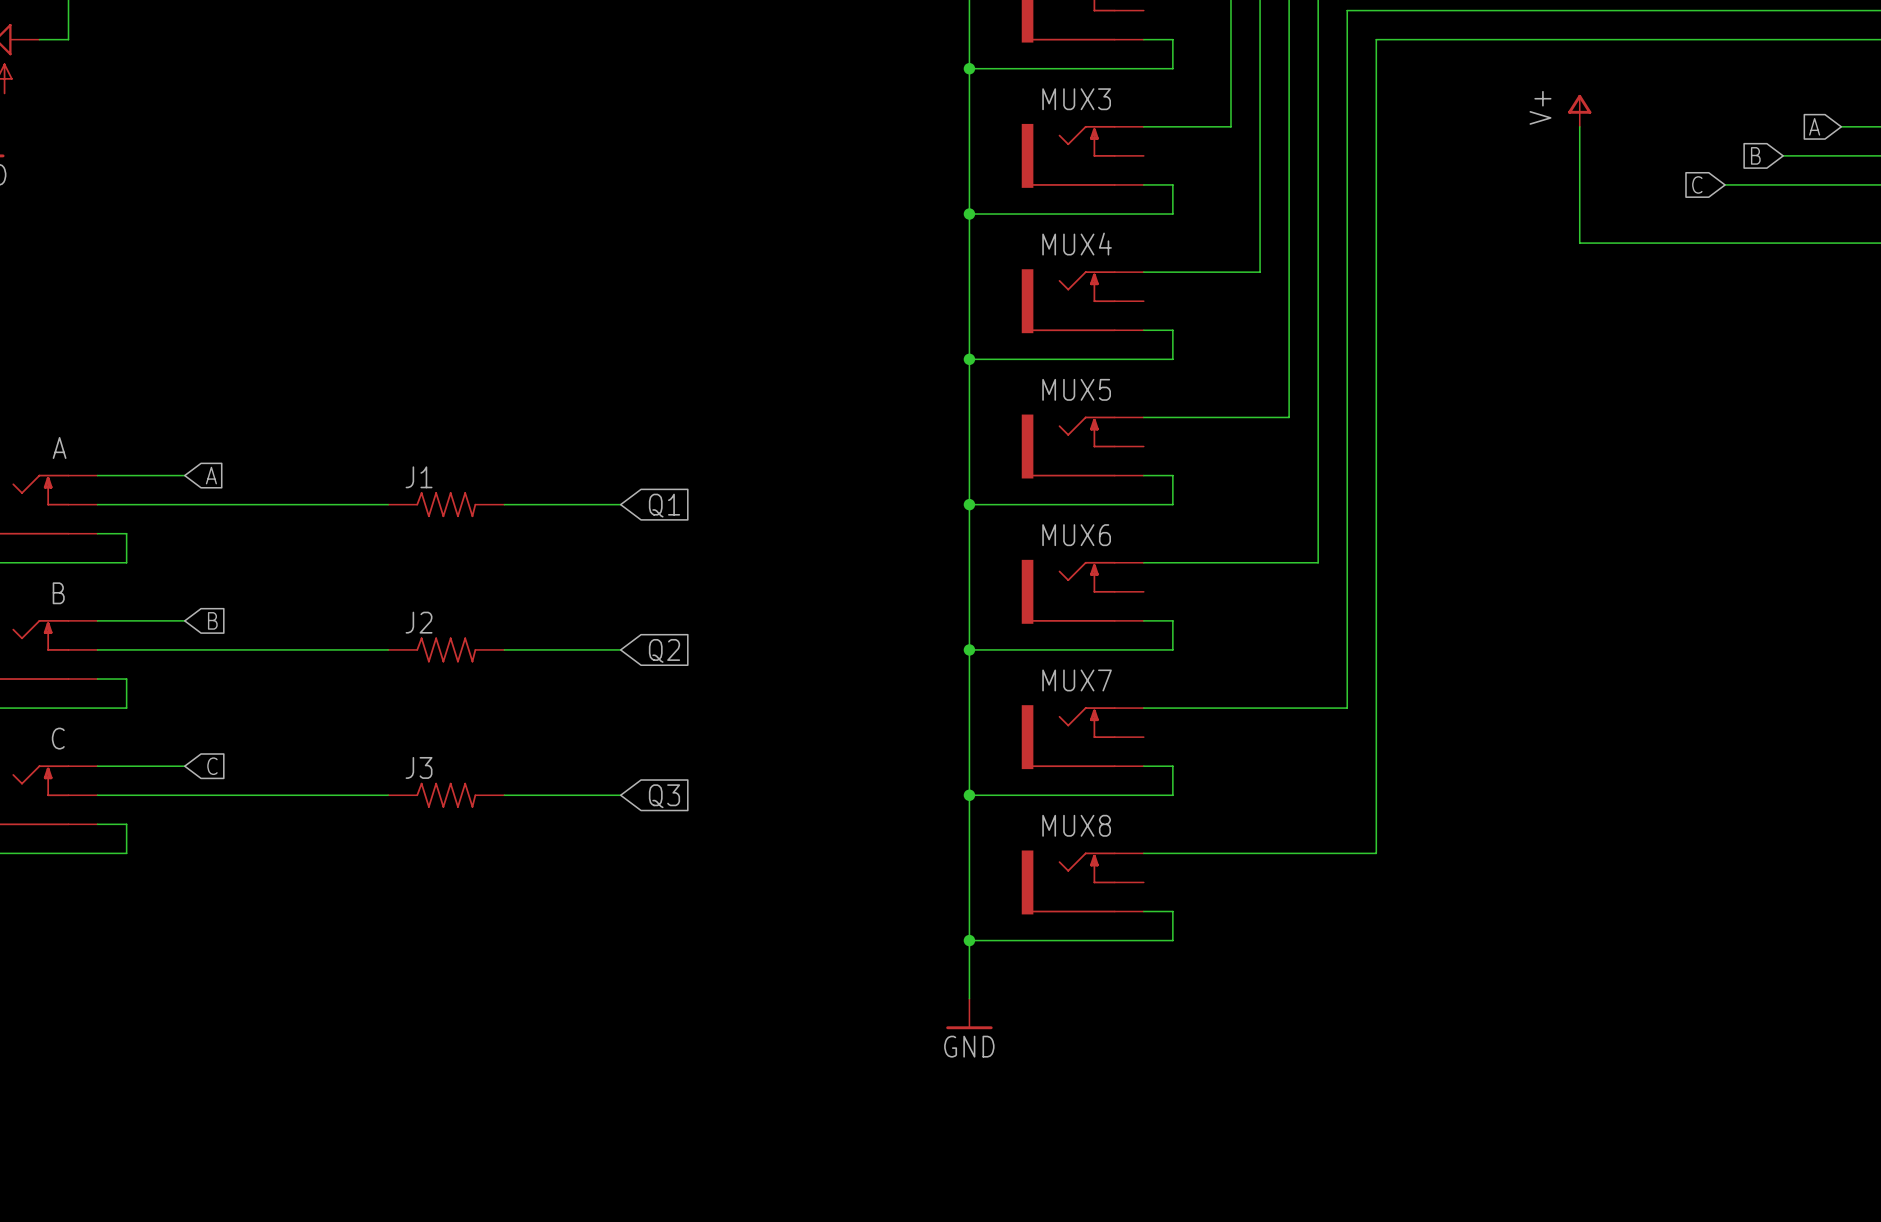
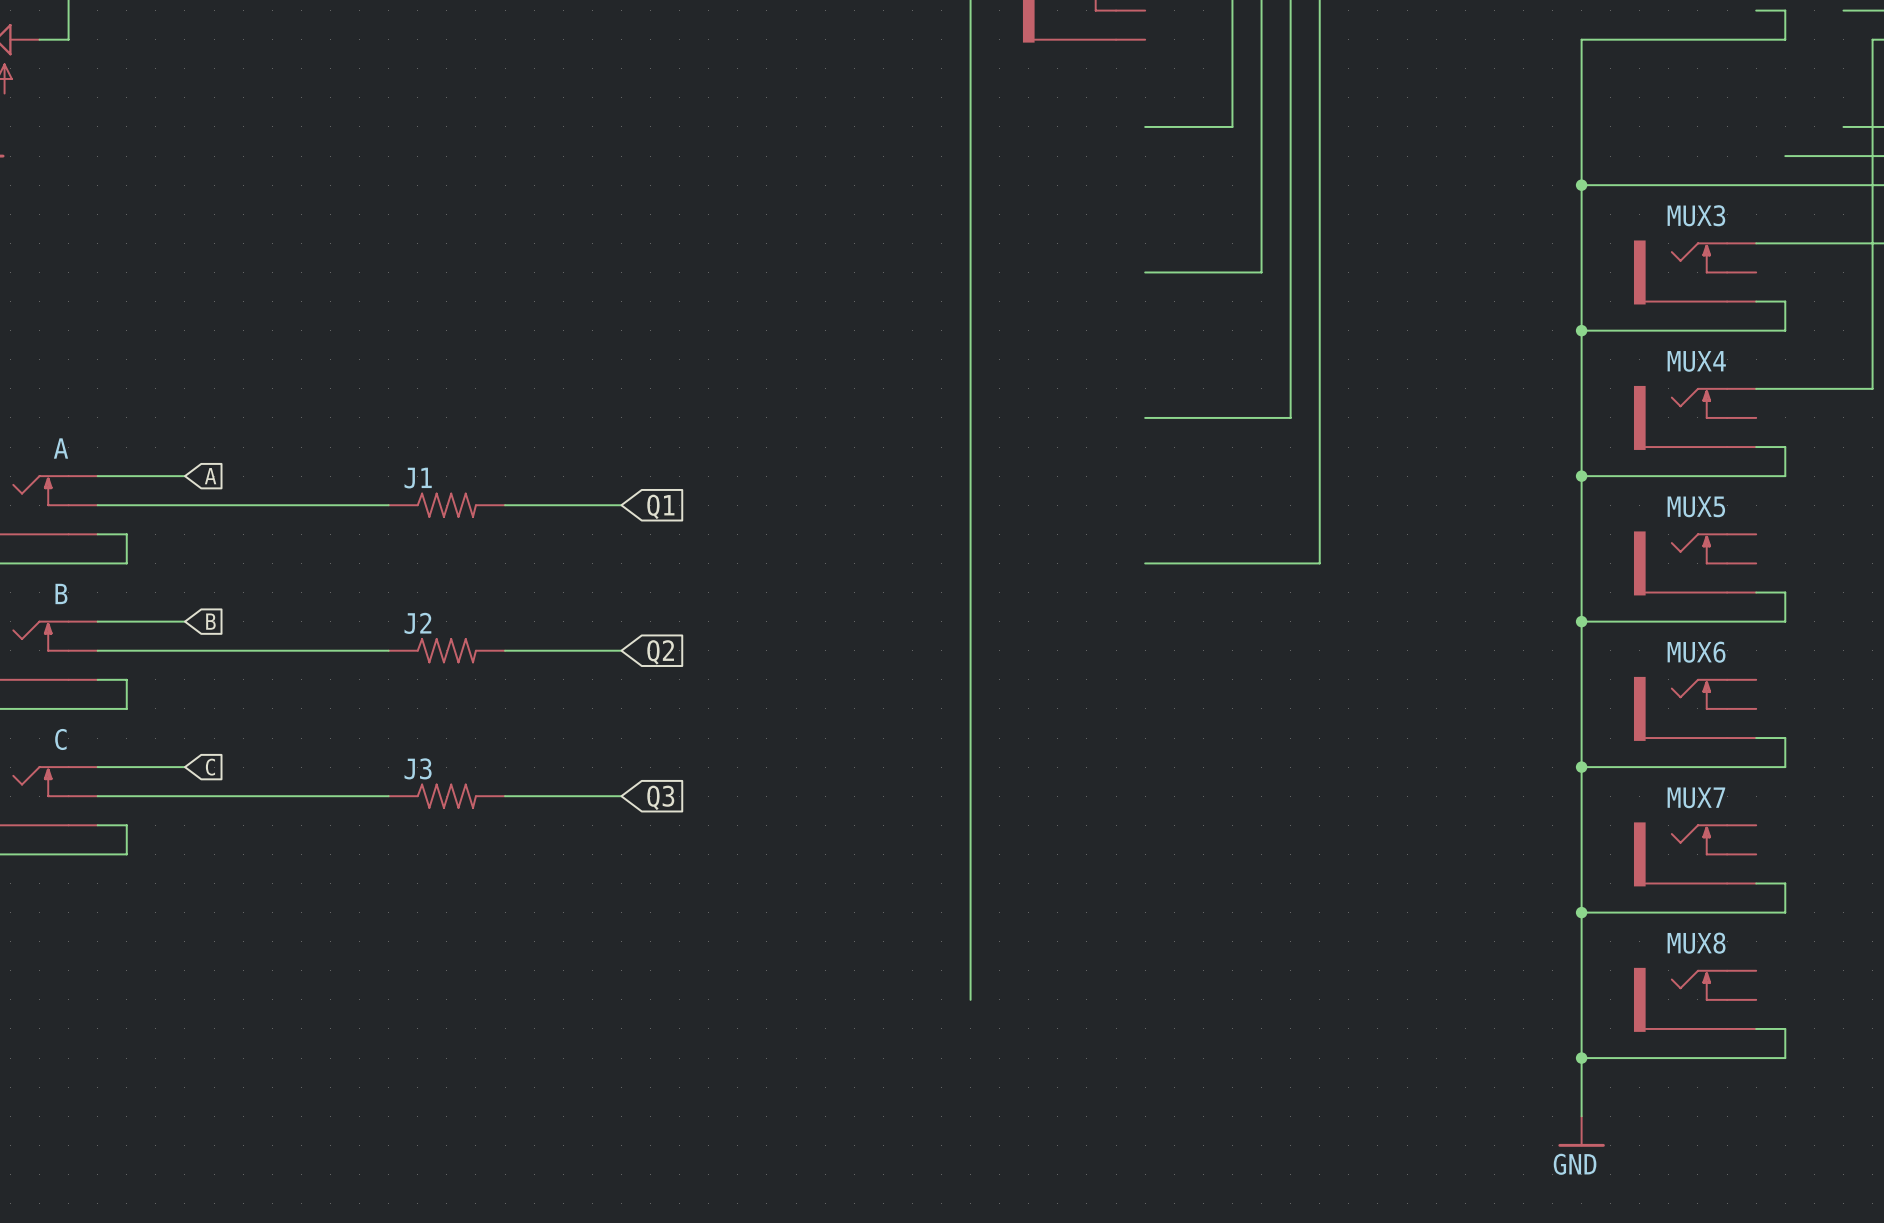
wire: (1754, 10) (1347, 10) (1347, 708) (1143, 708) -> none
wire: (1783, 10) (1841, 10) -> (1785, 10) (1785, 39)
wire: (1143, 39) (1172, 39) (1172, 68) (969, 68) -> none
wire: (1579, 39) (1376, 39) (1376, 853) (1143, 853) -> (1581, 39) (1581, 126)
wire: (1783, 39) (1870, 39) -> (1756, 388) (1872, 388) (1872, 39)
junction: (969, 68) -> none
power symbol: V+ (1579, 110) -> none
global label: A (1814, 126) -> none
MUX3 position: (1082, 155) -> (1695, 272)
global label: B (1755, 155) -> none
wire: (1143, 184) (1172, 184) (1172, 214) (969, 214) -> none
wire: none -> (1581, 185) (1727, 185)
junction: none -> (1581, 185)
global label: C (1697, 184) -> none
junction: (969, 214) -> none
wire: (1579, 243) (1754, 243) -> (1581, 243) (1581, 1116)
MUX4 position: (1082, 301) -> (1695, 417)
wire: none -> (1756, 301) (1785, 301) (1785, 330) (1581, 330)
wire: (1143, 330) (1172, 330) (1172, 359) (969, 359) -> none
junction: none -> (1581, 330)
junction: (969, 359) -> none
MUX5 position: (1082, 446) -> (1695, 563)
wire: none -> (1756, 447) (1785, 447) (1785, 476) (1581, 476)
wire: (1143, 475) (1172, 475) (1172, 504) (969, 504) -> none
junction: none -> (1581, 476)
junction: (969, 504) -> none
MUX6 position: (1082, 591) -> (1695, 708)
wire: none -> (1756, 592) (1785, 592) (1785, 621) (1581, 621)
wire: (1143, 620) (1172, 620) (1172, 649) (969, 649) -> none
junction: none -> (1581, 621)
junction: (969, 649) -> none
MUX7 position: (1082, 737) -> (1695, 854)
wire: none -> (1756, 738) (1785, 738) (1785, 767) (1581, 767)
wire: (1143, 766) (1172, 766) (1172, 795) (969, 795) -> none
junction: none -> (1581, 767)
junction: (969, 795) -> none
MUX8 position: (1082, 882) -> (1695, 999)
wire: none -> (1756, 883) (1785, 883) (1785, 912) (1581, 912)
wire: (1143, 911) (1172, 911) (1172, 940) (969, 940) -> none
junction: none -> (1581, 912)
junction: (969, 940) -> none
power symbol: GND (969, 1013) -> none
wire: none -> (1756, 1028) (1785, 1028) (1785, 1058) (1581, 1058)
junction: none -> (1581, 1058)
power symbol: none -> GND (1581, 1131)

